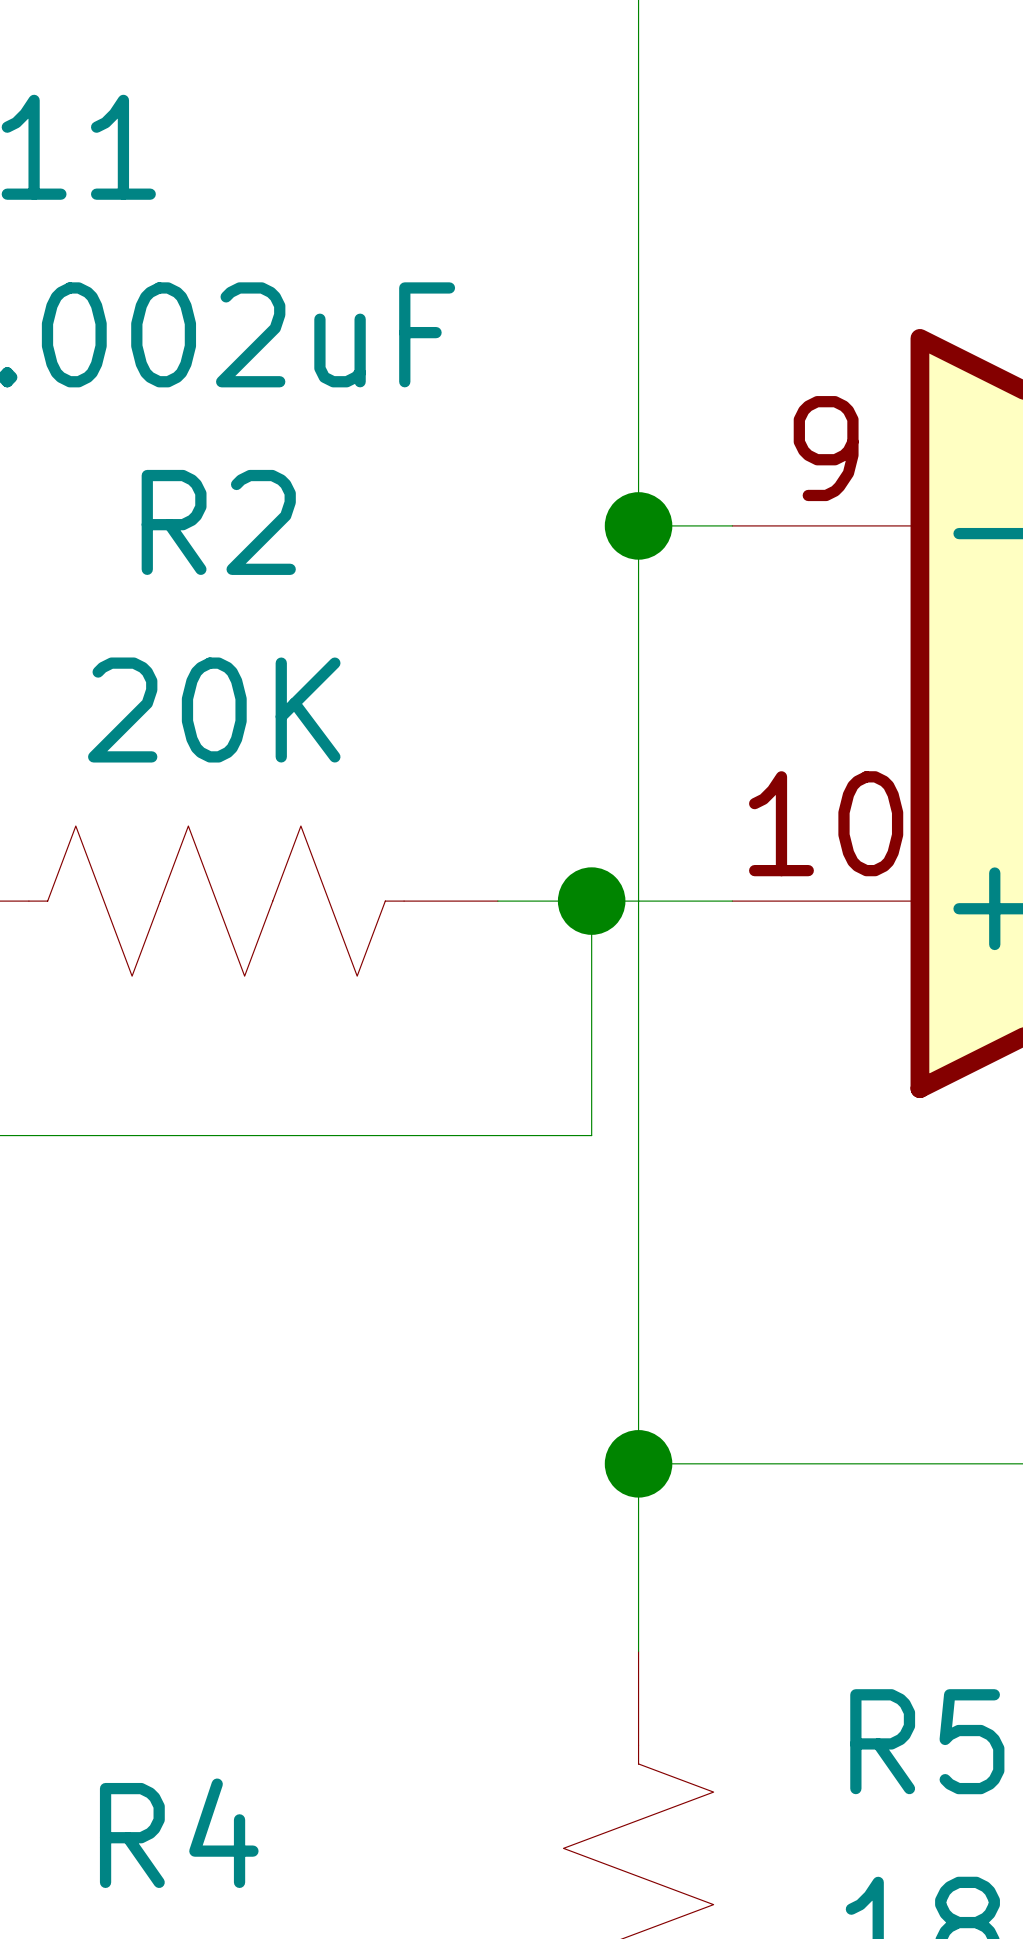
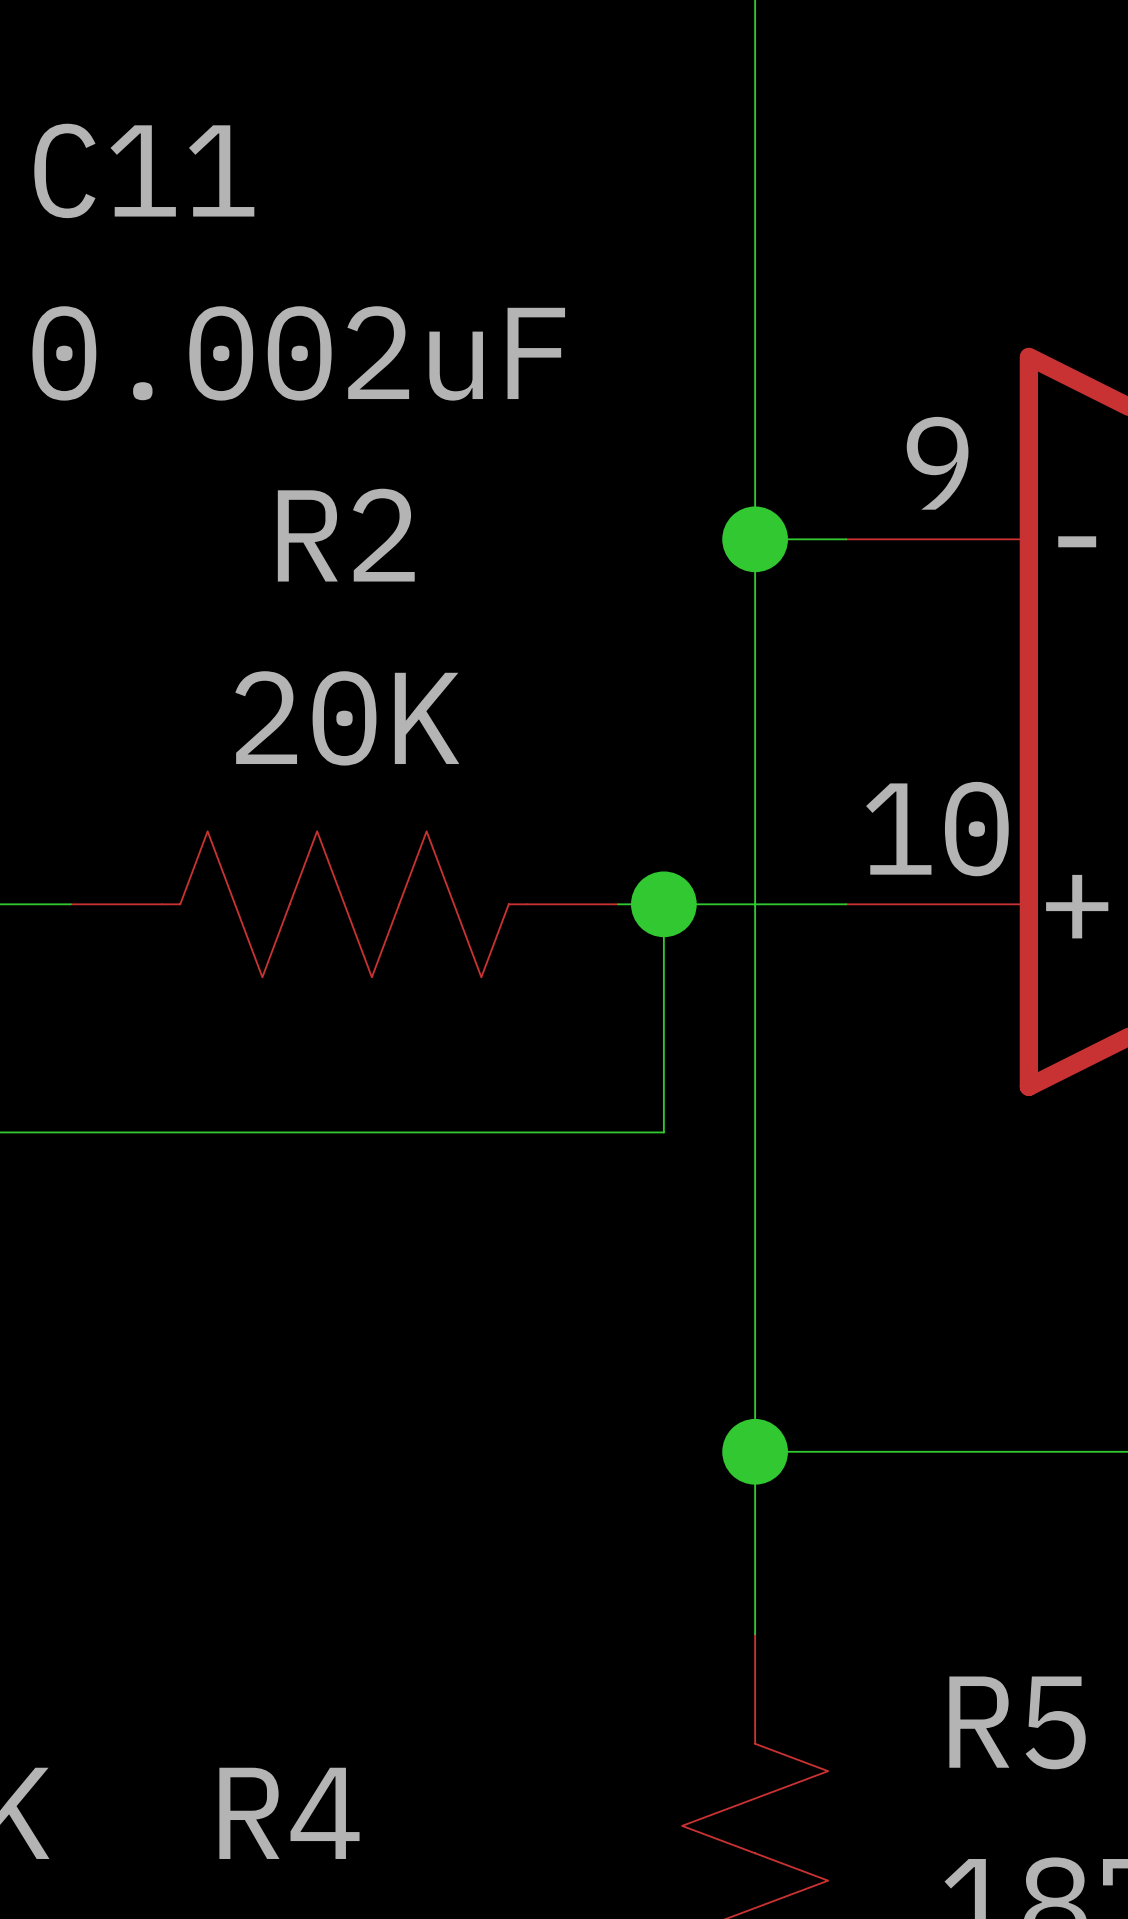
wire: (591, 901) (591, 1135) (544, 1135) -> (663, 904) (663, 1132)
junction position: (591, 901) -> (663, 904)

